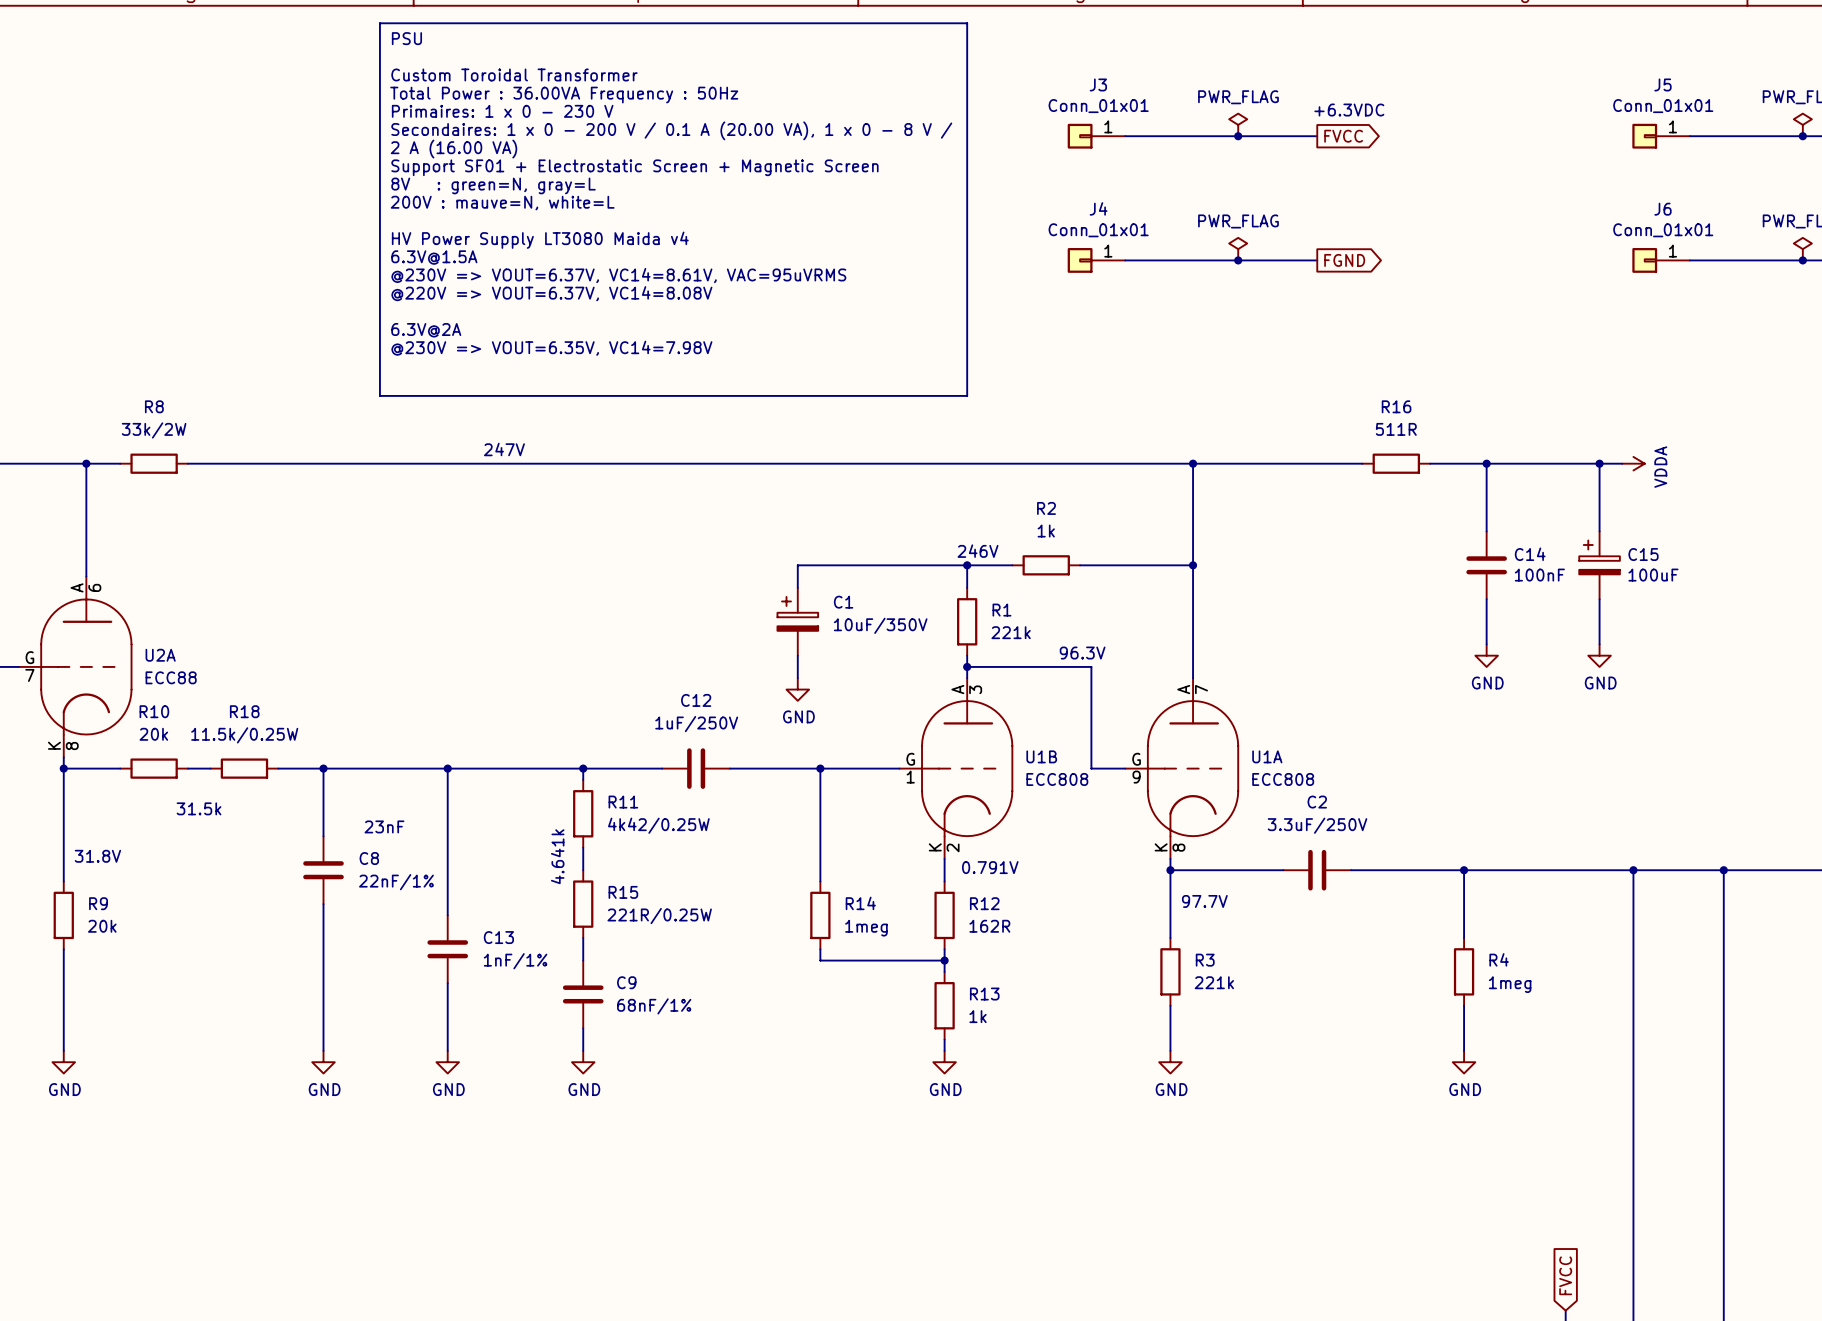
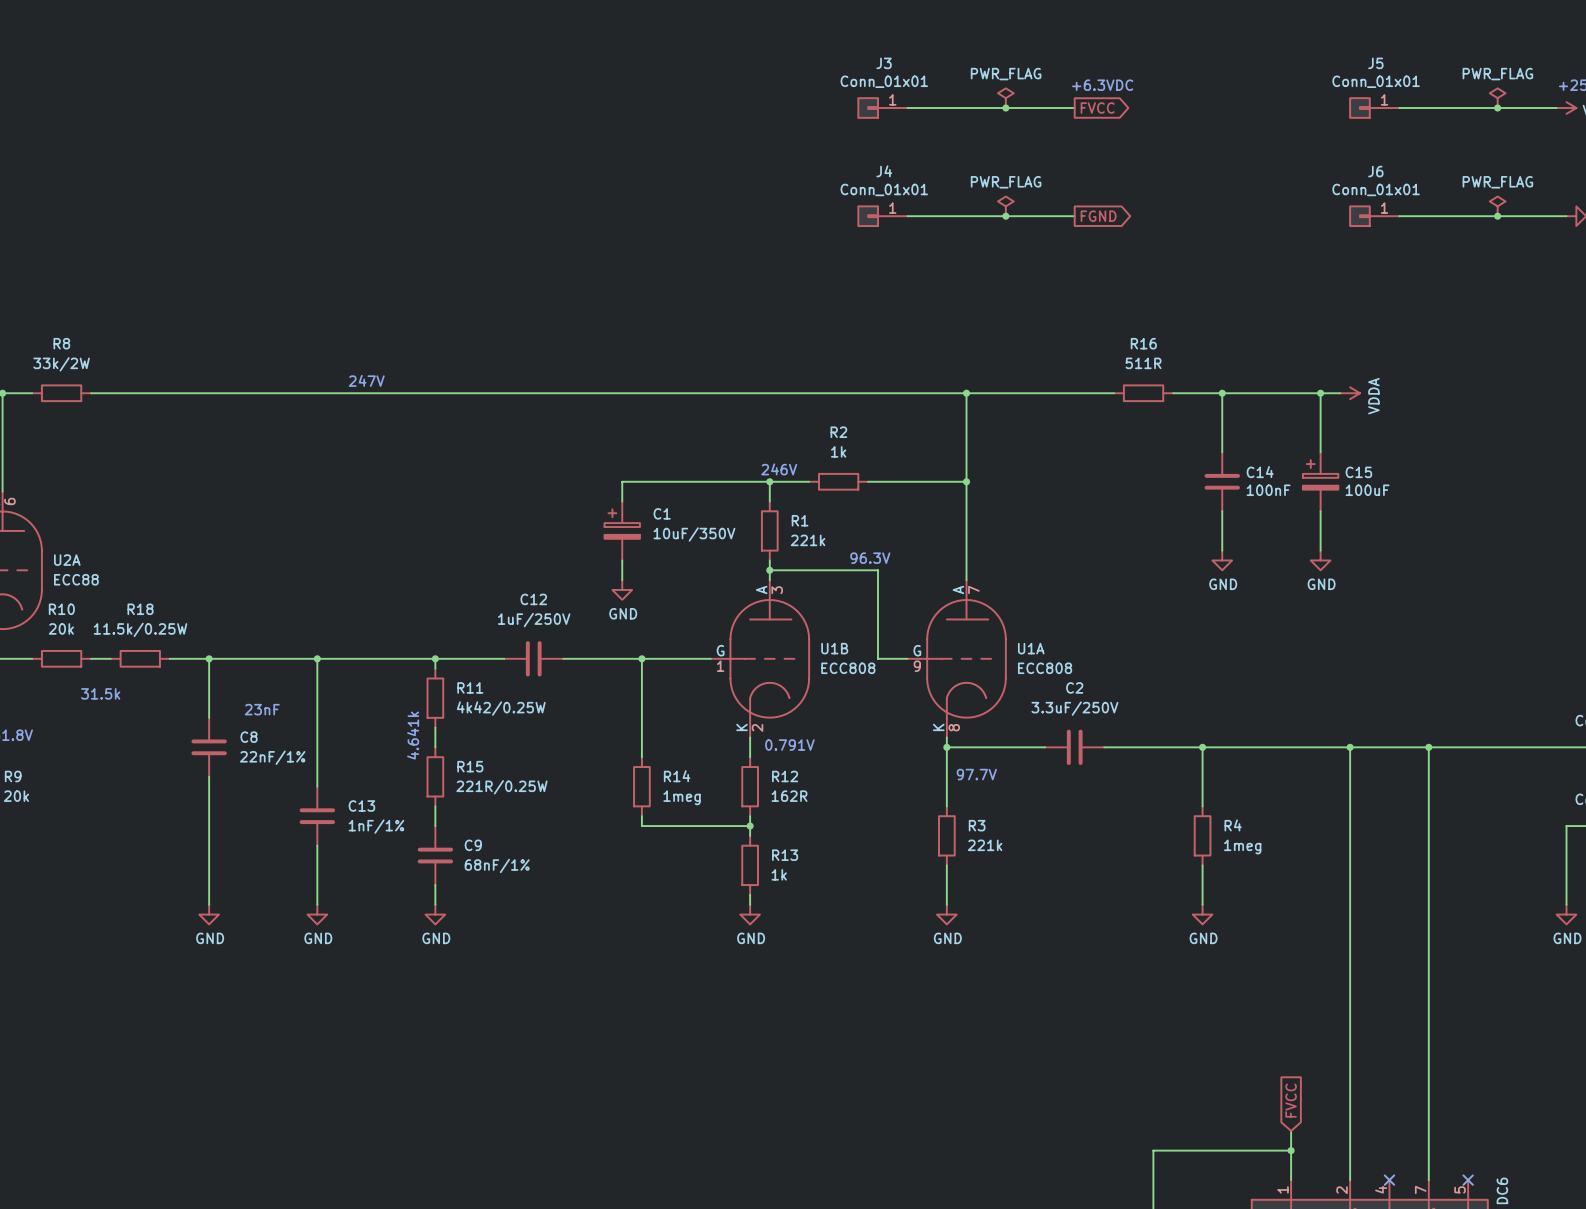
line: (379, 23) (967, 23) (967, 395) (379, 395) (379, 23) -> none
text: PSU (406, 38) -> none
text: Custom Toroidal Transformer (514, 74) -> none
text: Total Power : 36.00VA Frequency : 50Hz (564, 95) -> none
text: Primaires: 1 x 0 - 230 V (502, 111) -> none
text: Secondaires: 1 x 0 - 200 V / 0.1 A (20.00 VA), 1 x 0 - 8 V / (671, 130) -> none
text: 2 A (16.00 VA) (453, 149) -> none
text: Support SF01 + Electrostatic Screen + Magnetic Screen (634, 167) -> none
text: 8V : green=N, gray=L (493, 185) -> none
text: 200V : mauve=N, white=L (502, 203) -> none
text: HV Power Supply LT3080 Maida v4 (540, 240) -> none
text: 6.3V@1.5A (434, 257) -> none
text: @230V => VOUT=6.37V, VC14=8.61V, VAC=95uVRMS (618, 275) -> none
text: @220V => VOUT=6.37V, VC14=8.08V (551, 293) -> none
text: 6.3V@2A (426, 330) -> none
text: @230V => VOUT=6.35V, VC14=7.98V (551, 348) -> none

